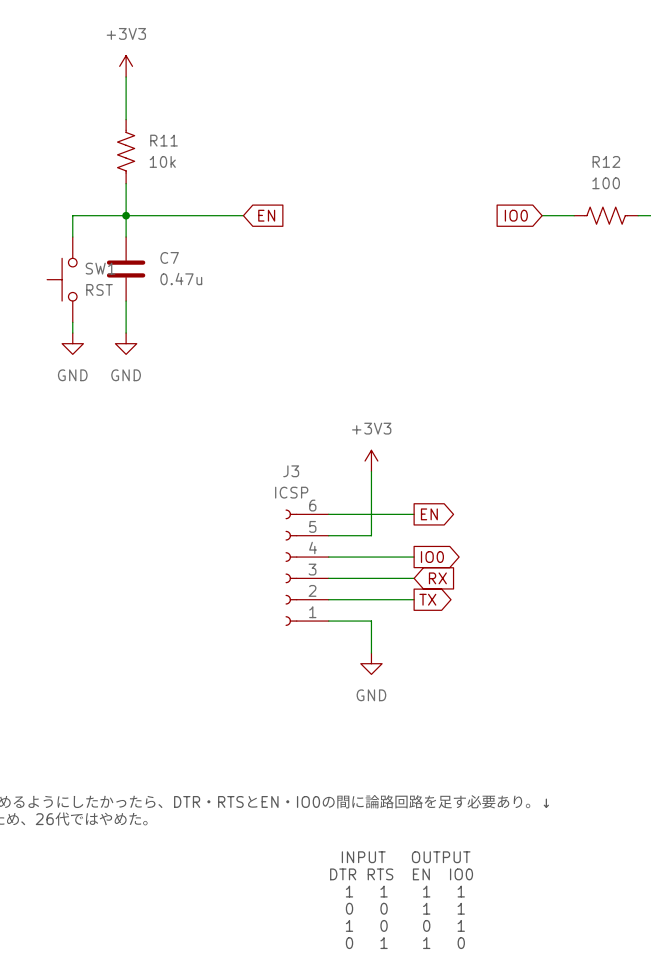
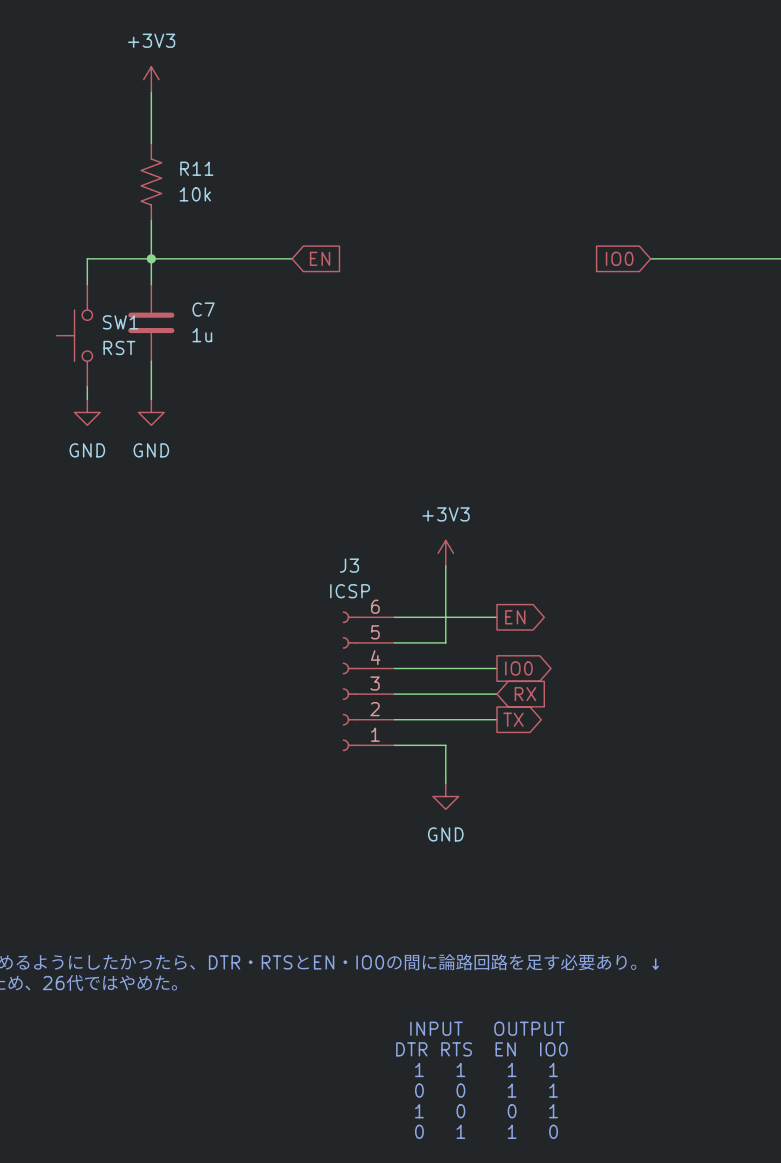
R12: 100 (606, 215) -> none
C7 value: 0.47u (181, 279) -> 1u (202, 335)

